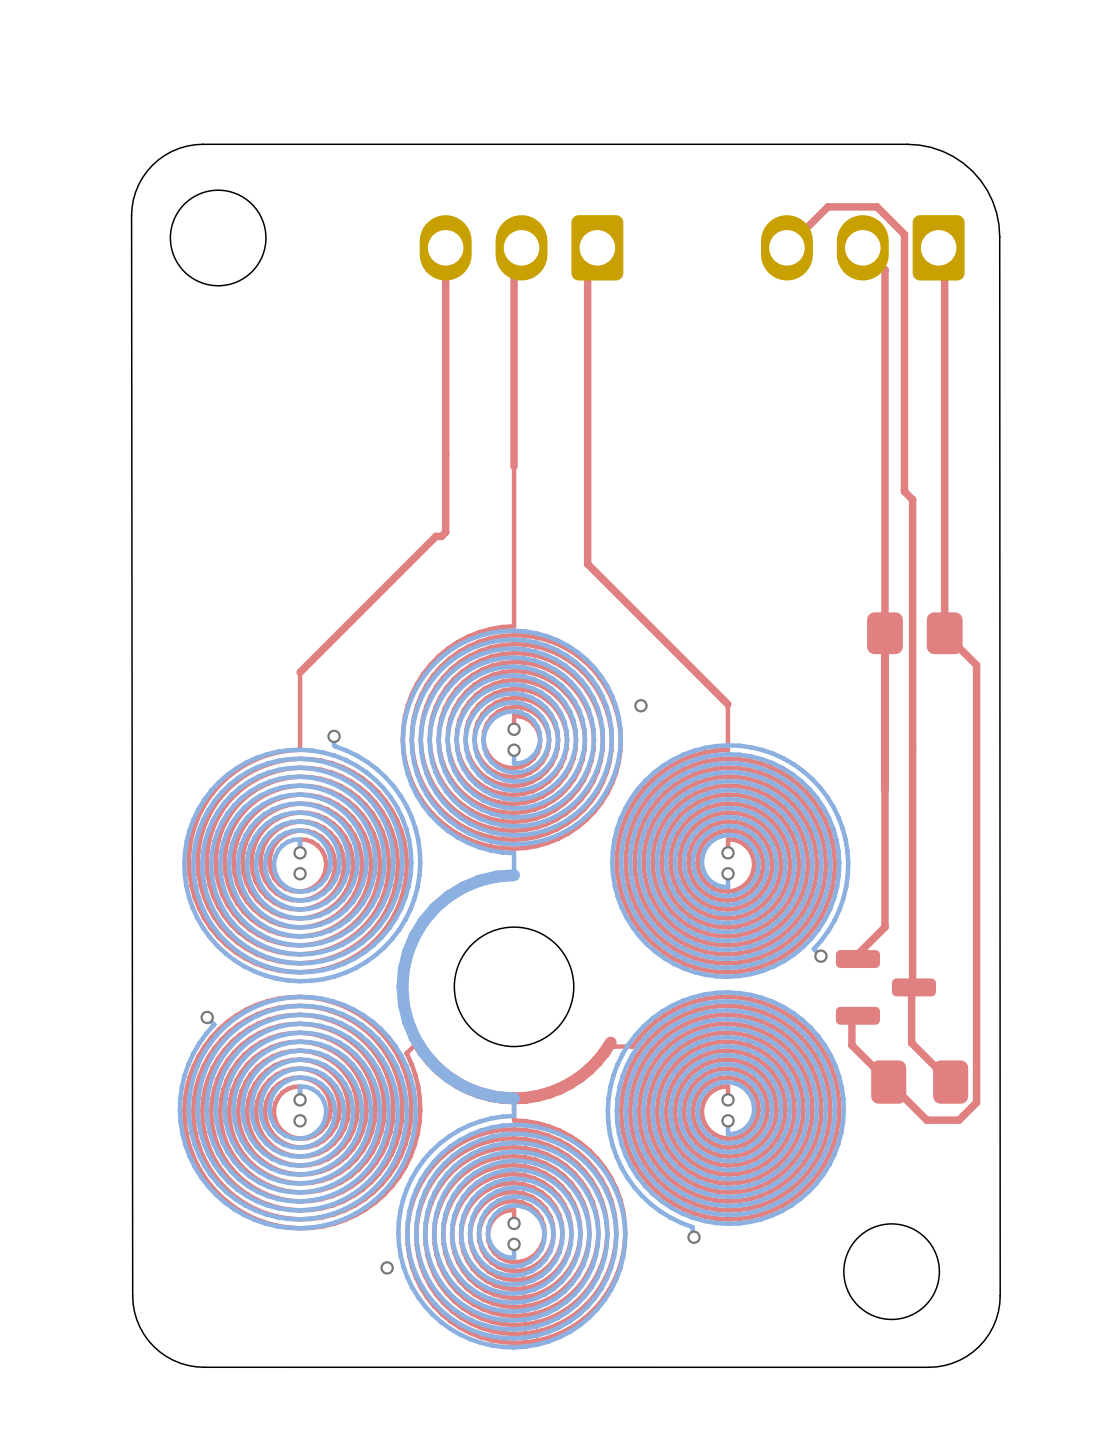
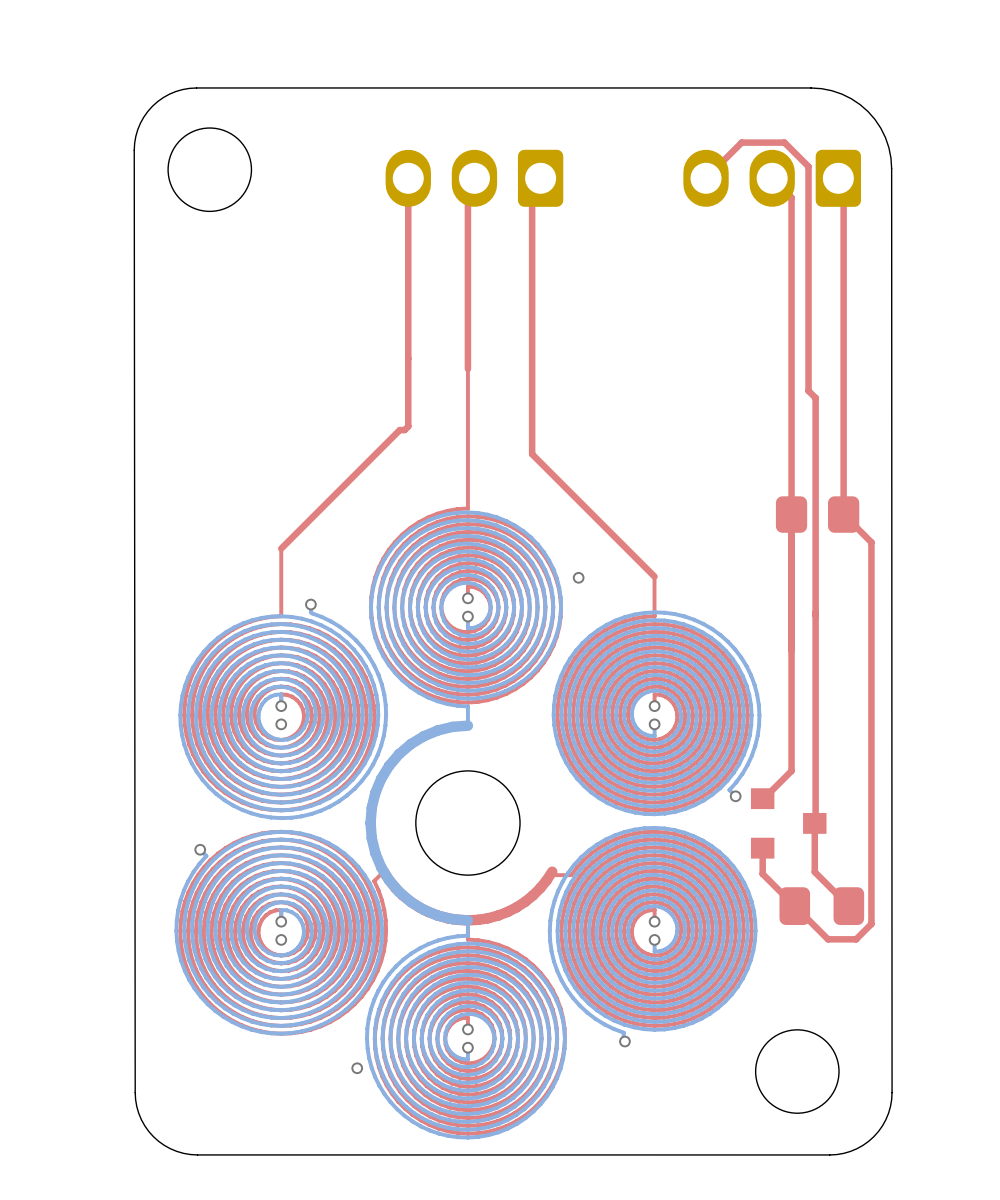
part footprint: [835, 950, 936, 1025] -> [750, 788, 827, 859]

